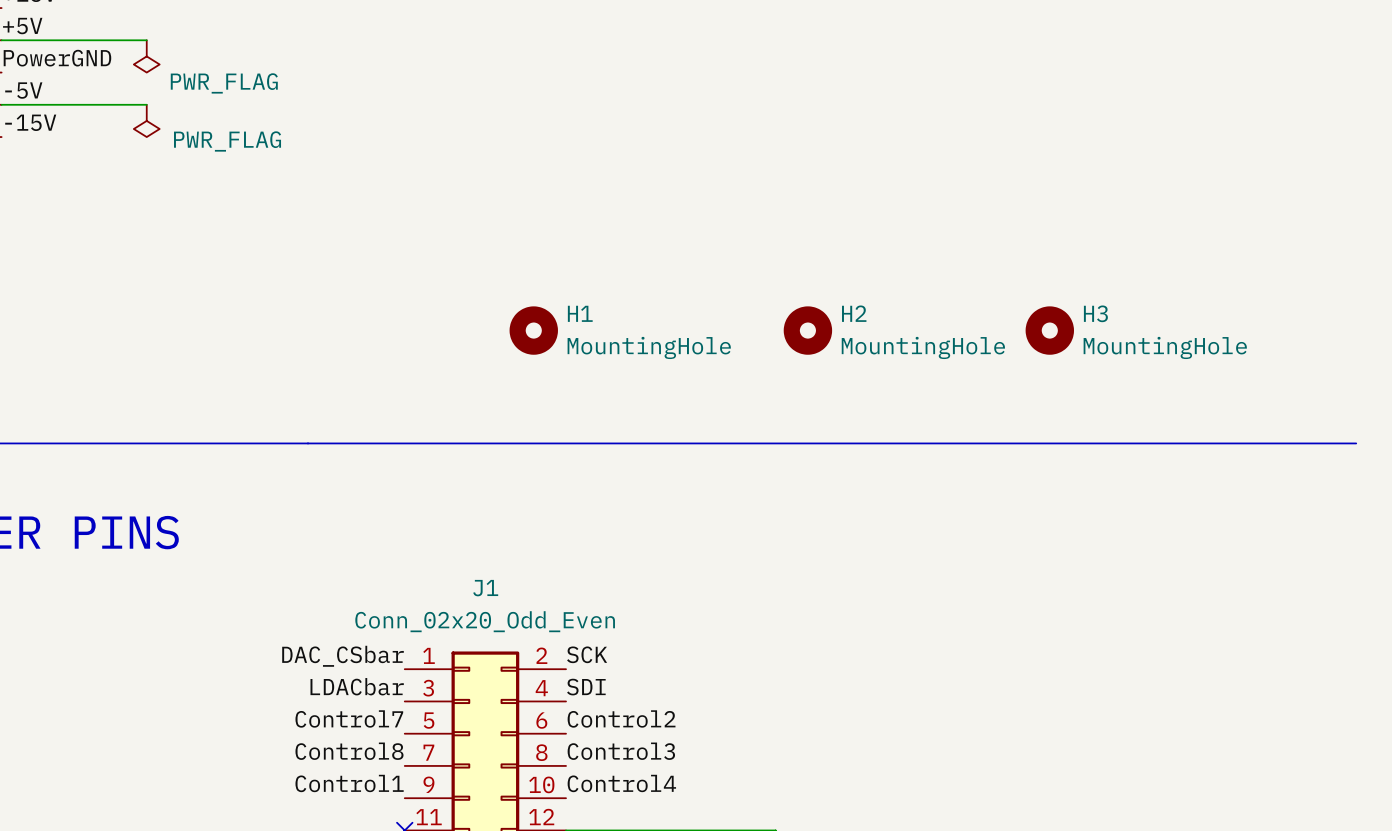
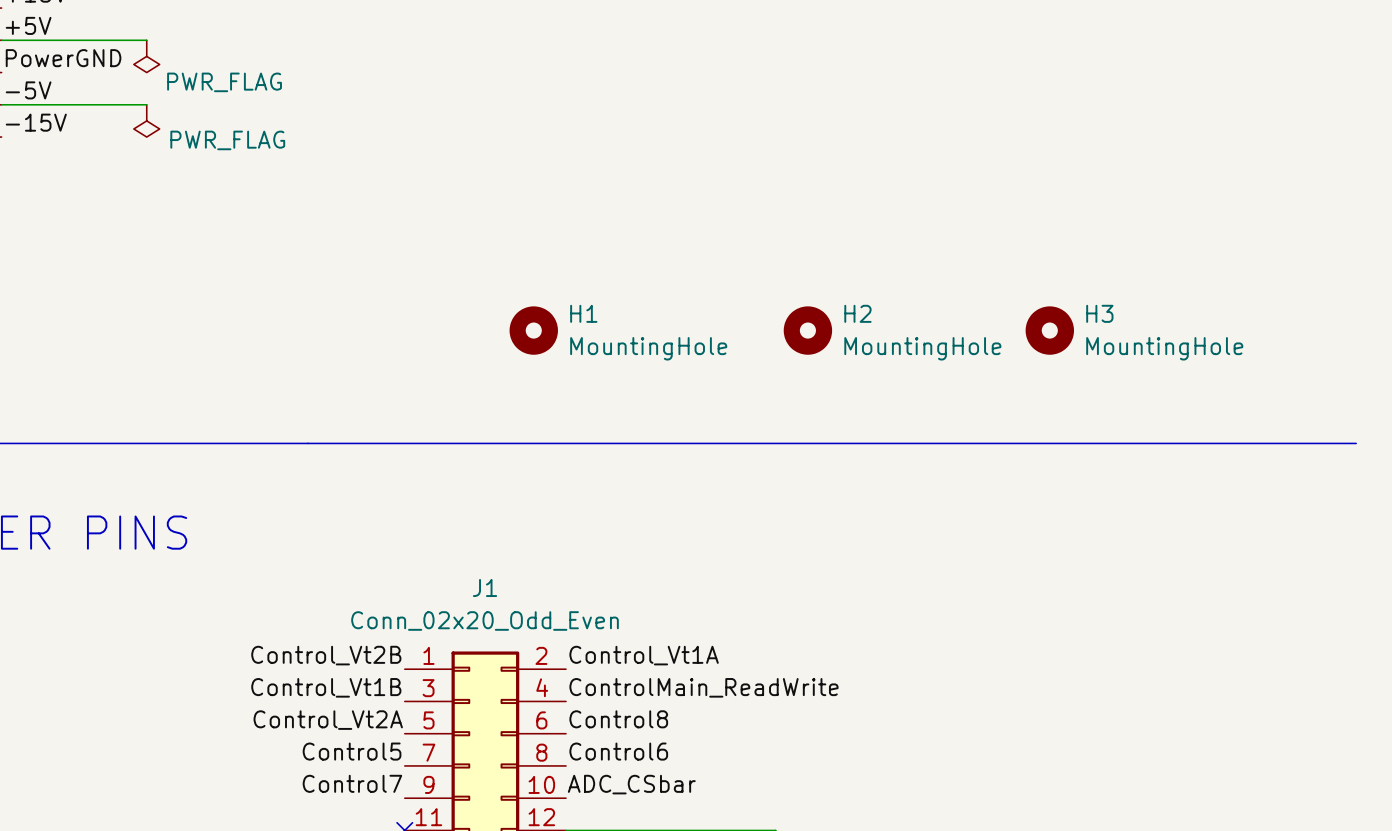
label: SCK (587, 654) -> Control_Vt1A (644, 655)
label: DAC_CSbar (343, 656) -> Control_Vt2B (326, 655)
label: LDACbar (357, 686) -> Control_Vt1B (326, 687)
label: SDI (586, 687) -> ControlMain_ReadWrite (703, 687)
label: Control7 (349, 718) -> Control_Vt2A (328, 720)
label: Control2 (621, 718) -> Control8 (618, 719)
label: Control8 (349, 751) -> Control5 (352, 751)
label: Control3 (621, 751) -> Control6 (618, 751)
label: Control1 (349, 783) -> Control7 (352, 783)
label: Control4 (621, 783) -> ADC_CSbar (631, 784)

